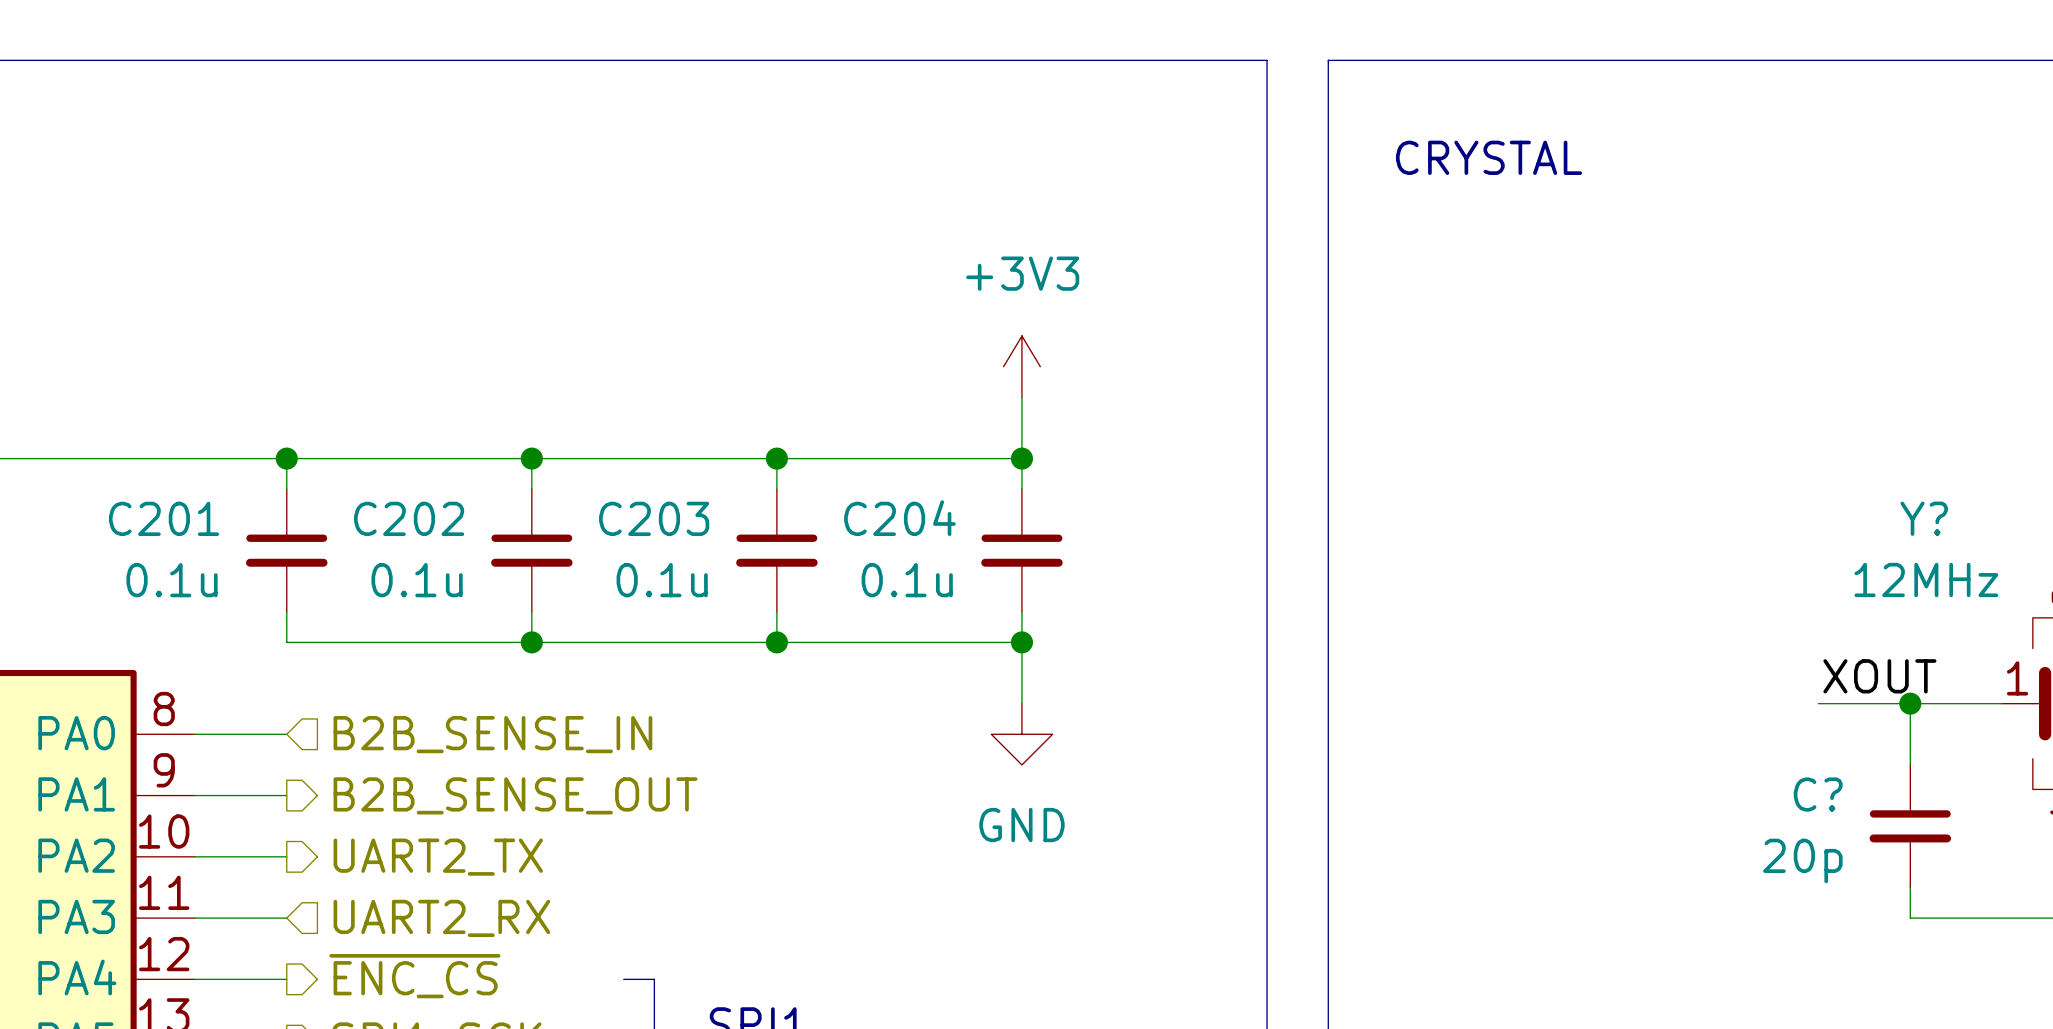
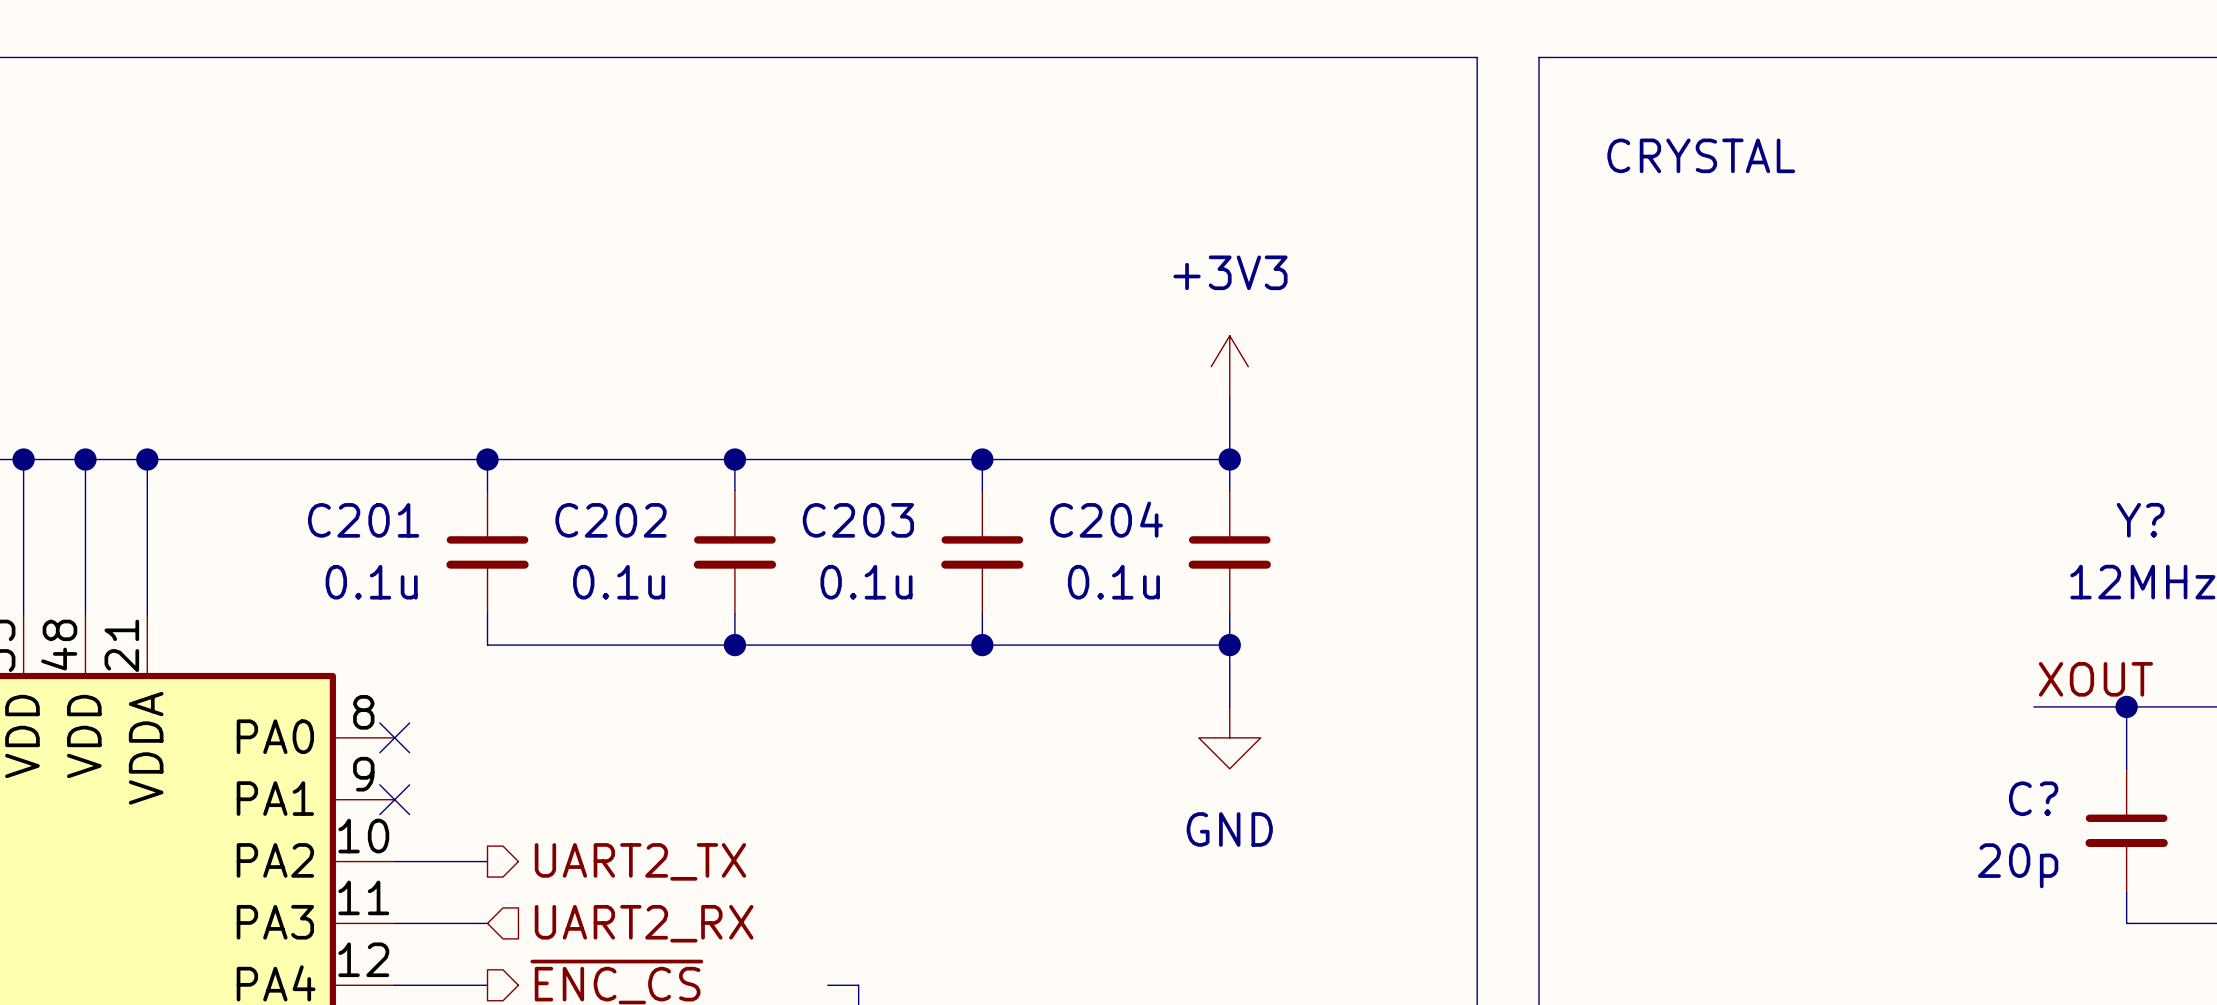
wire: (194, 734) (286, 734) -> none
no-connect mark: none -> (394, 737)
hierarchical label: B2B_SENSE_IN (492, 734) -> none
wire: (194, 795) (286, 795) -> none
no-connect mark: none -> (394, 799)
hierarchical label: B2B_SENSE_OUT (515, 795) -> none

